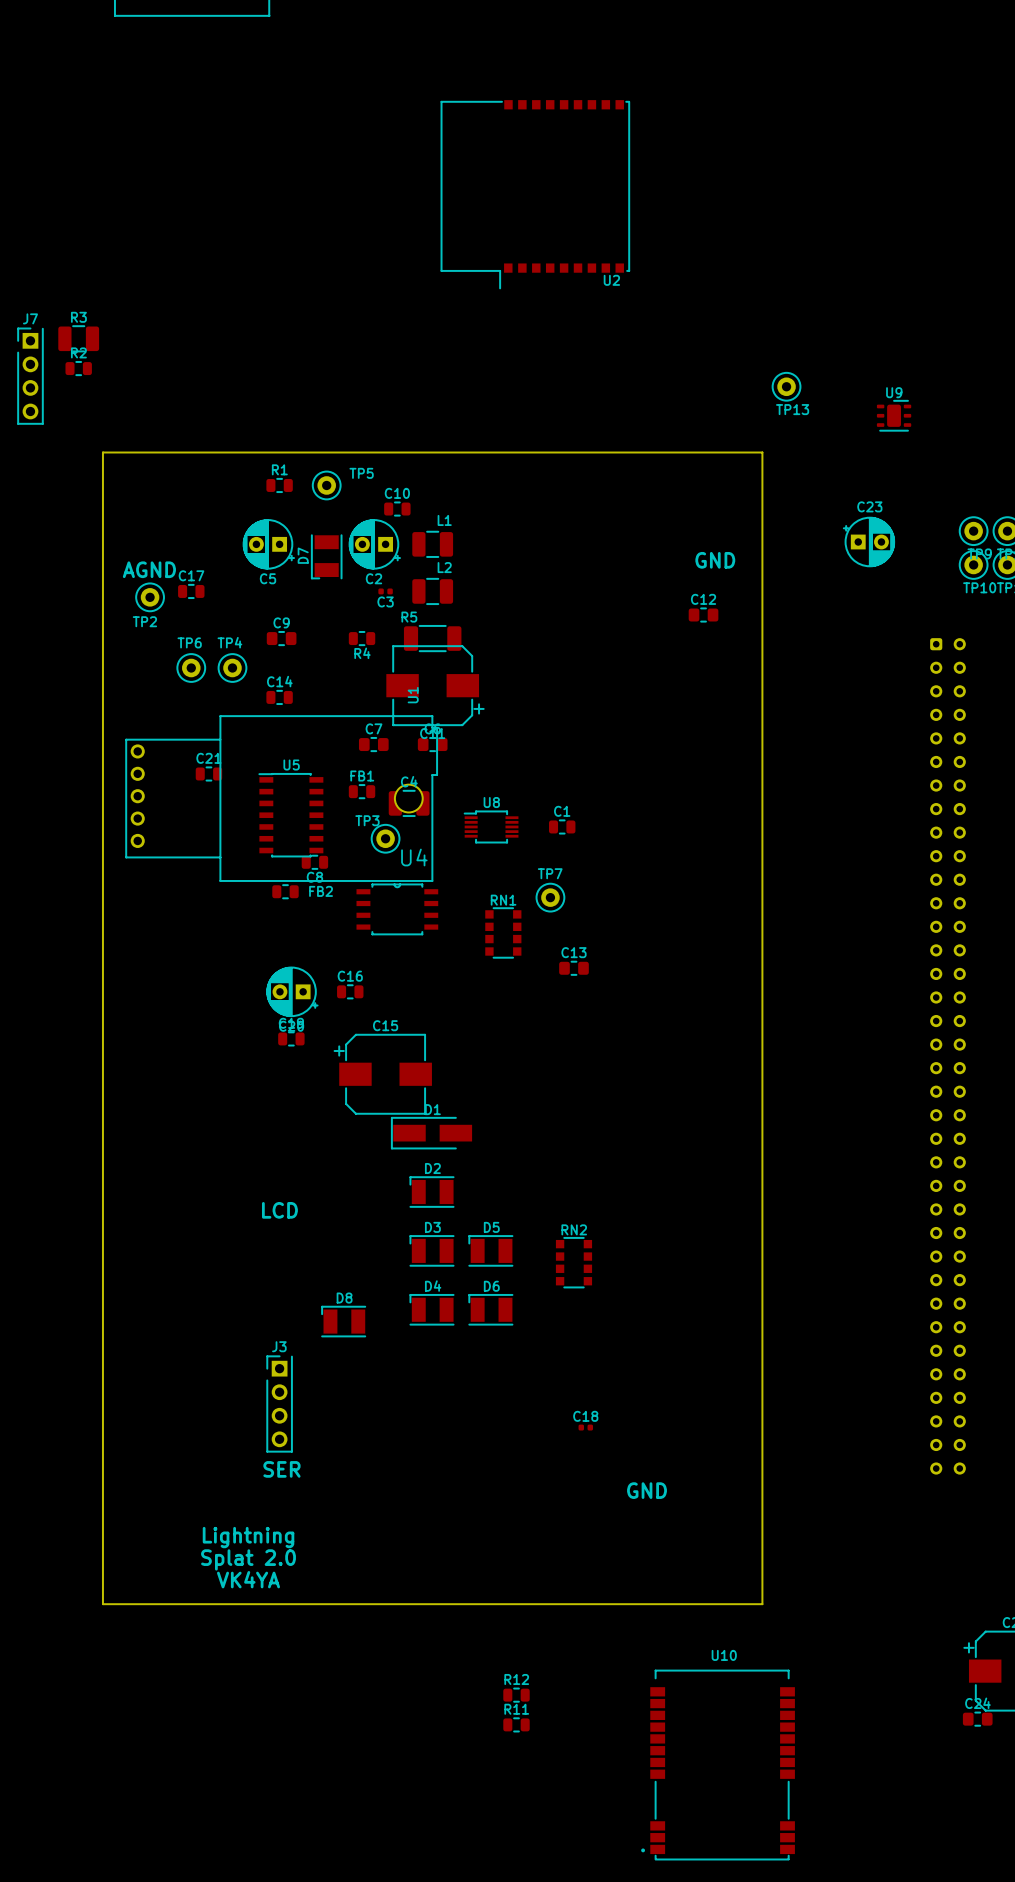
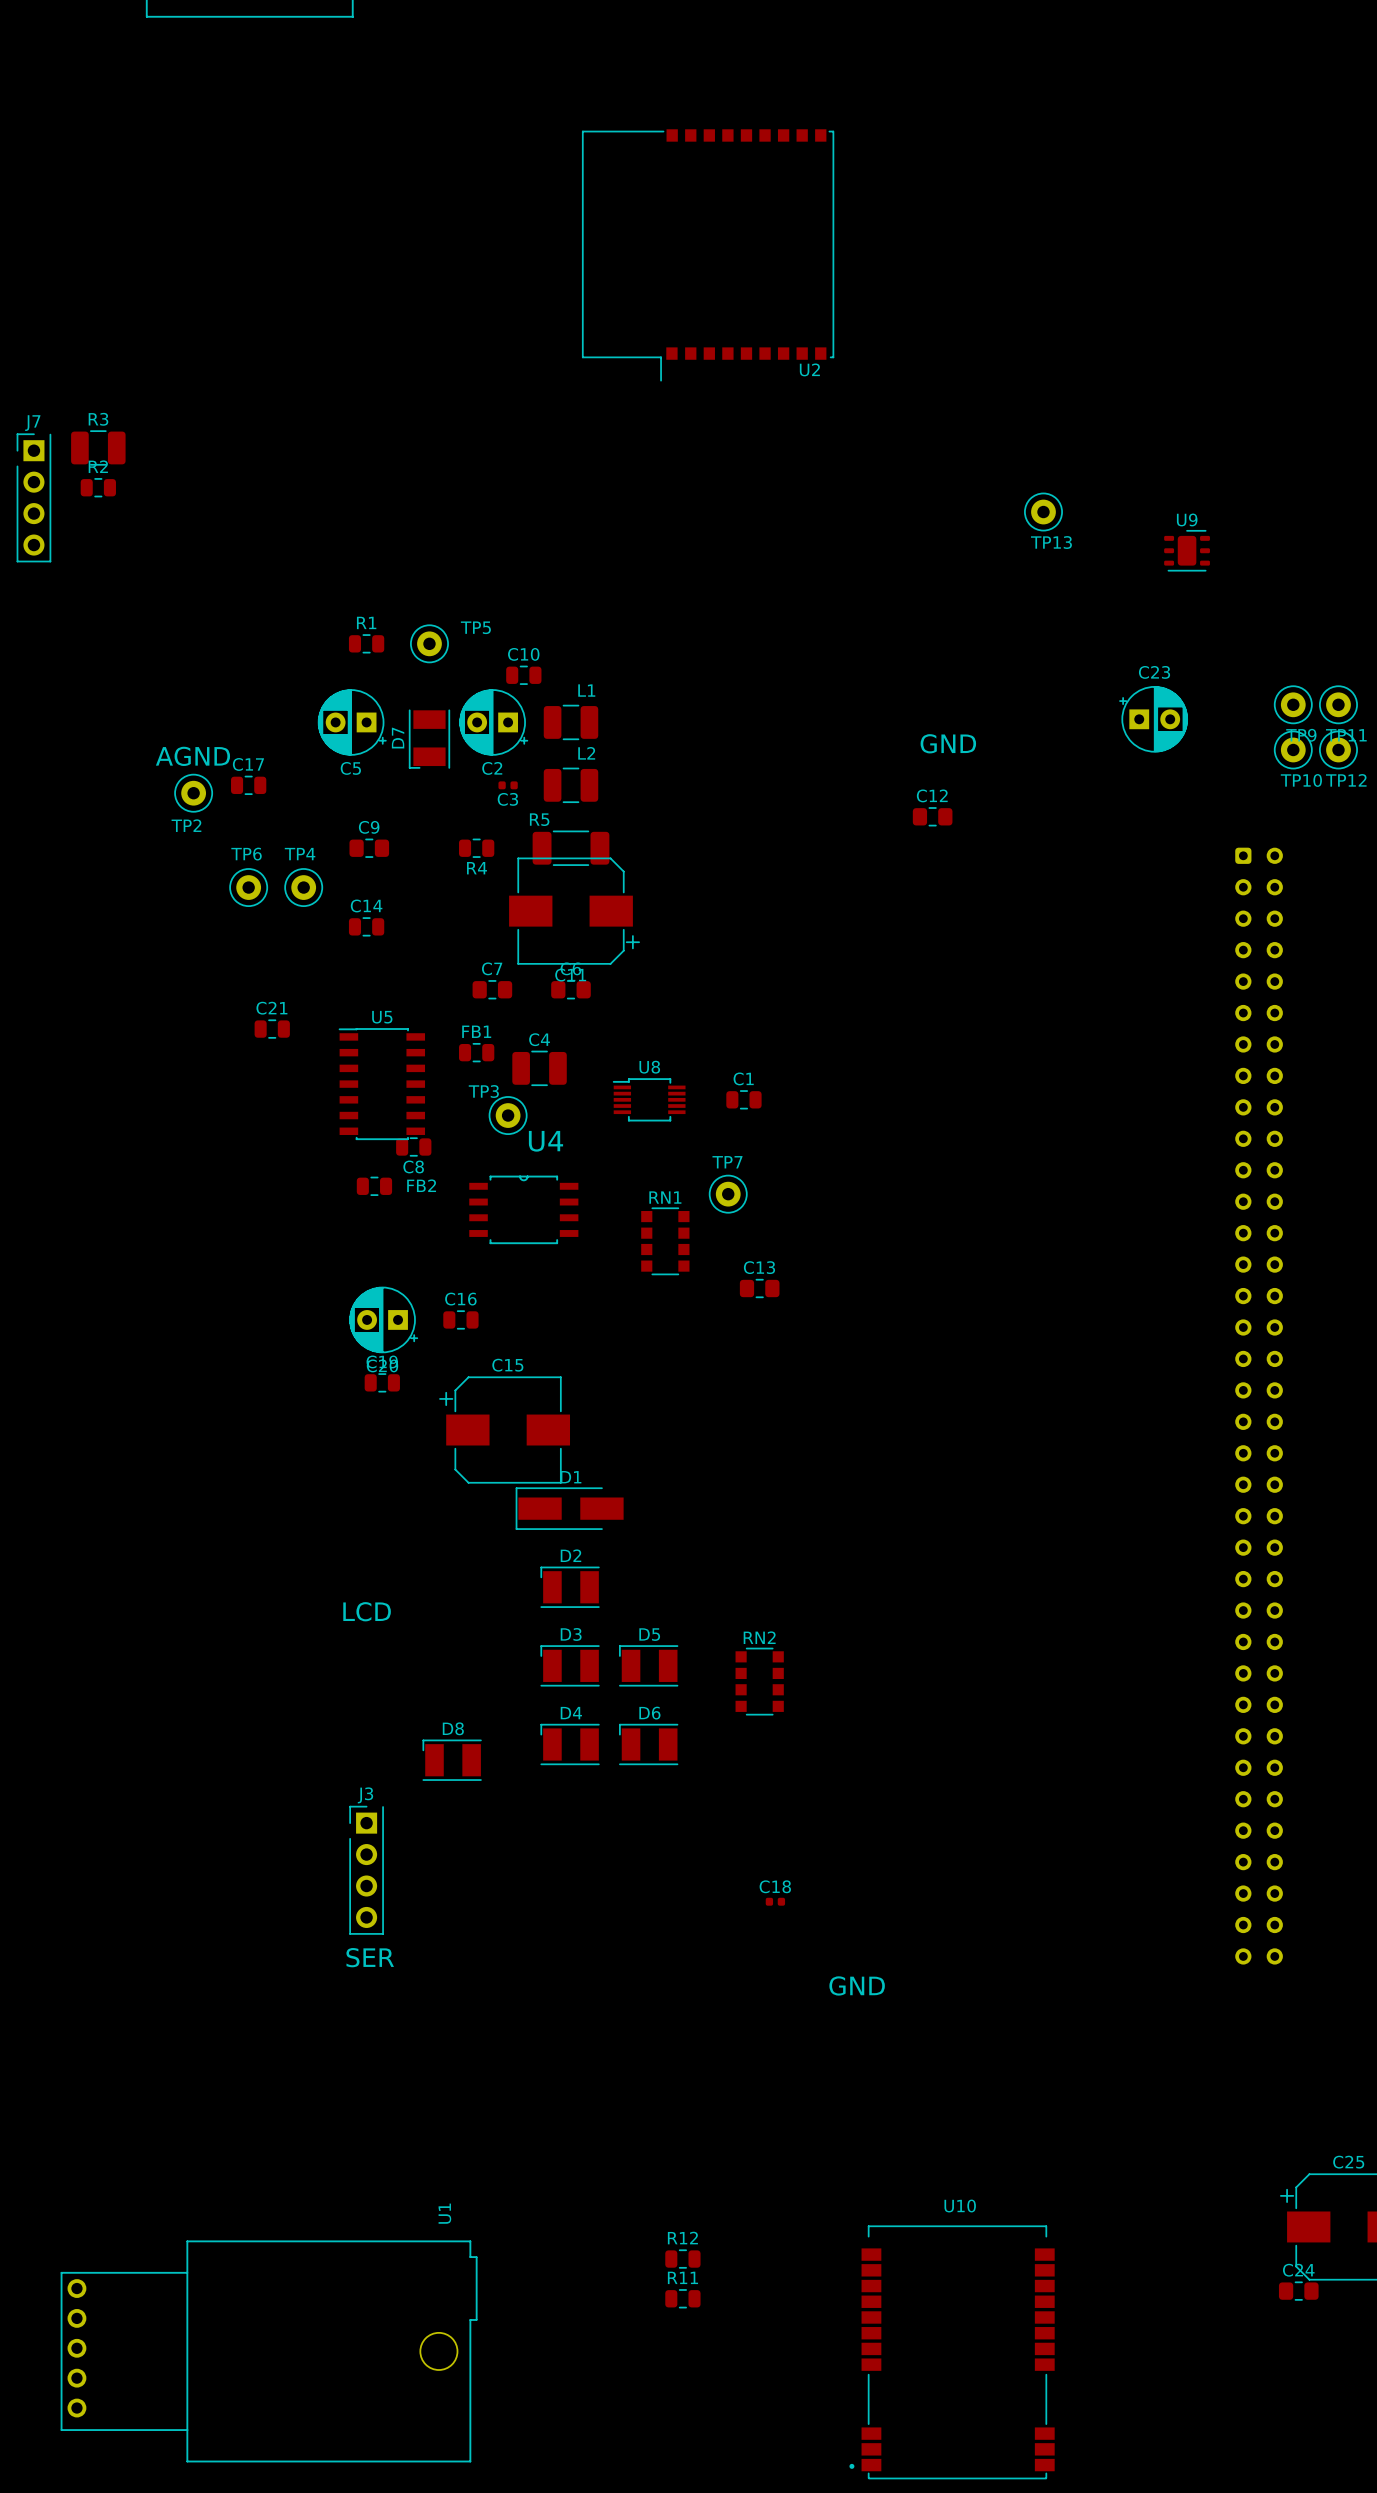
board edge: (102, 452) (102, 1604) (762, 1604) (762, 452) (102, 452) -> none
U1 position: (281, 798) -> (269, 2351)
text: Lightning (248, 1537) -> none
text: Splat 2.0 (248, 1559) -> none
text: VK4YA (248, 1579) -> none

